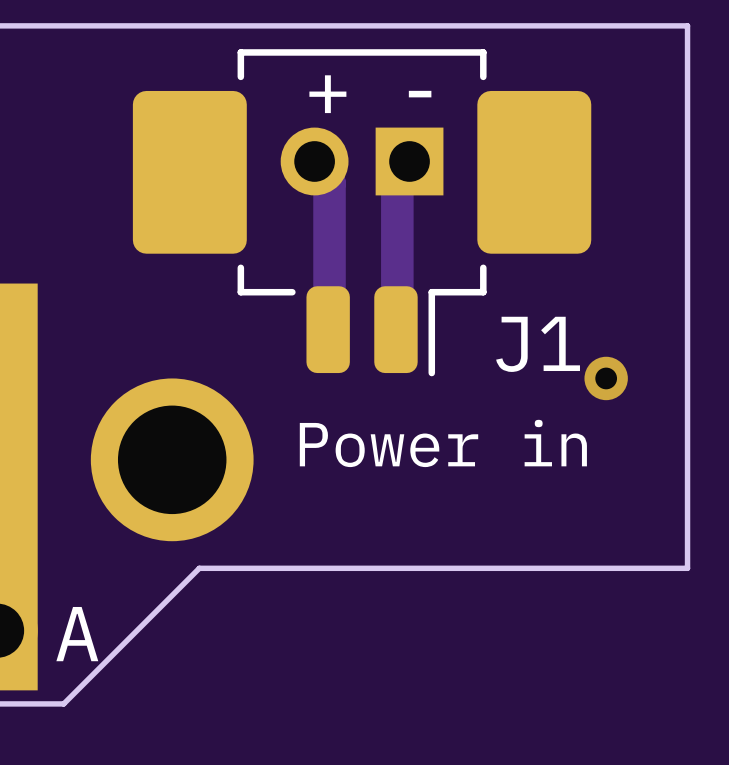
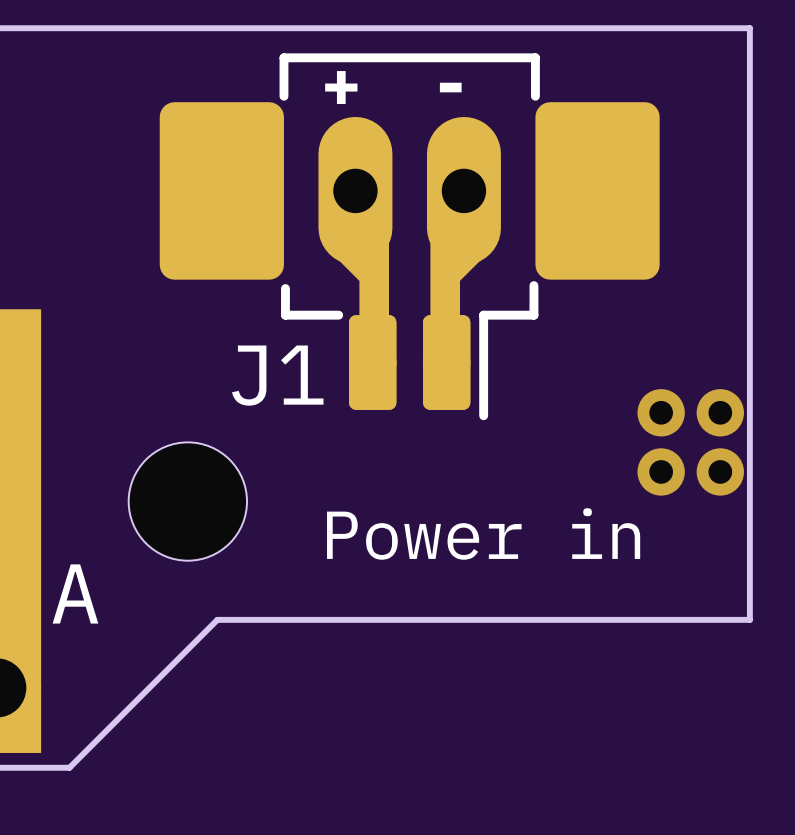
J1 footprint: [132, 49, 592, 377] -> [159, 53, 660, 421]
text: none -> + (341, 87)
text: none -> - (450, 87)
part: (362, 161) -> none
track: (313, 166) (329, 183) (329, 335) -> none
track: (413, 166) (397, 183) (397, 335) -> none
J1 name position: J1 (538, 344) -> J1 (277, 375)
part footprint: [90, 378, 254, 542] -> [128, 442, 248, 561]
via: none -> (720, 412)
via: none -> (661, 471)
via: none -> (720, 471)
text position: Power in (443, 443) -> Power in (483, 533)
part text position: A (77, 634) -> A (75, 593)

